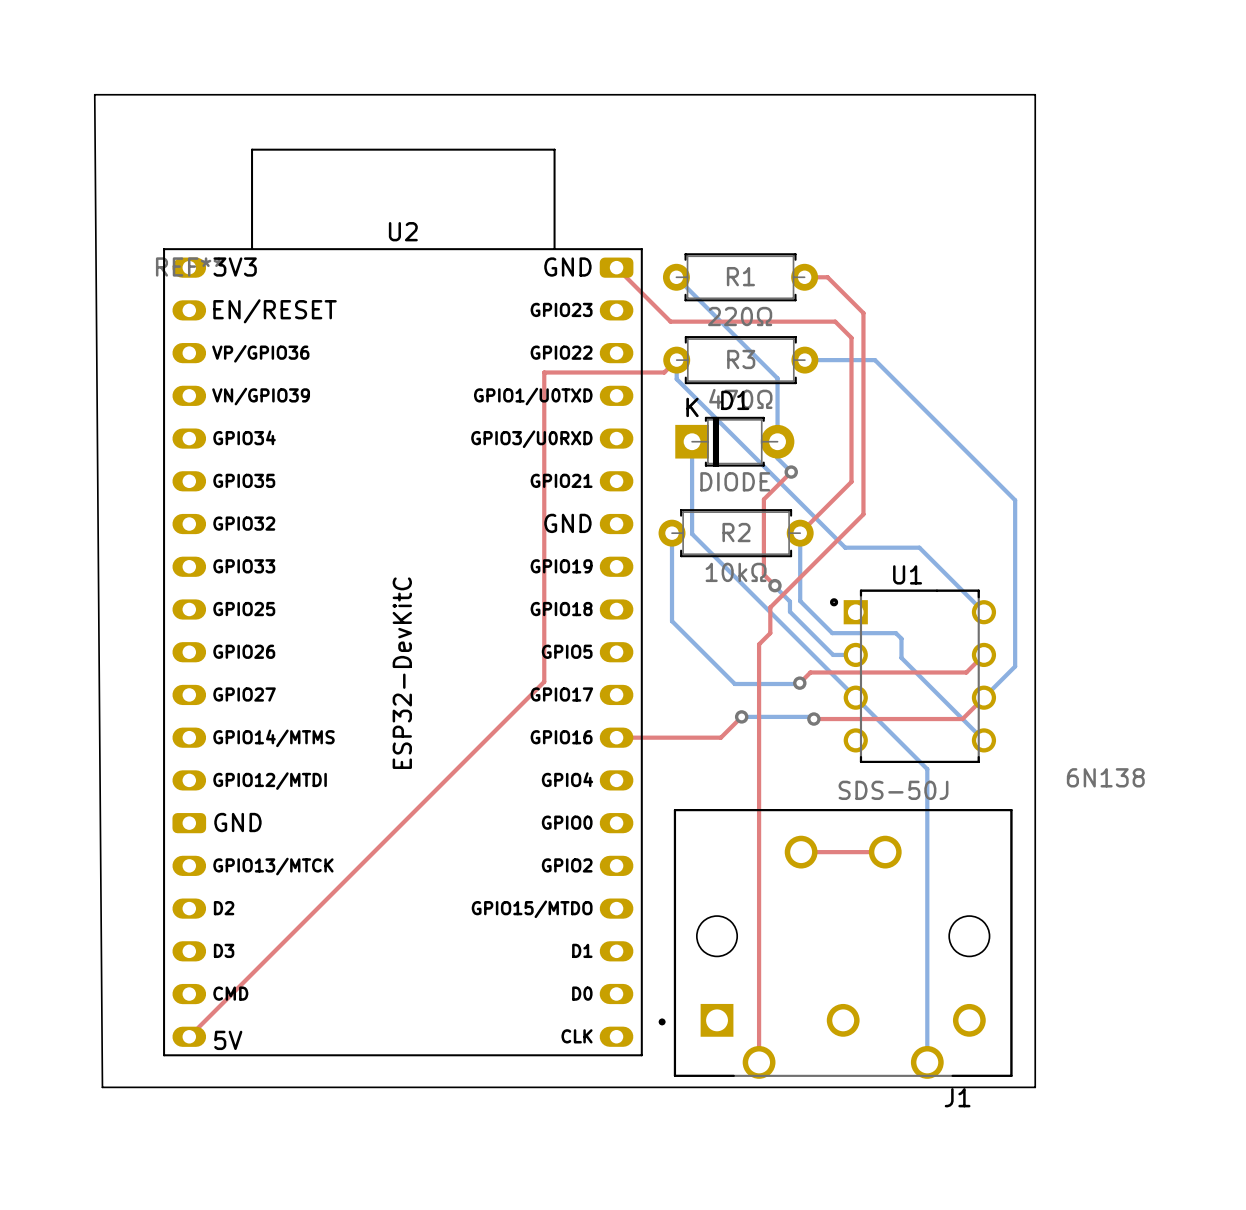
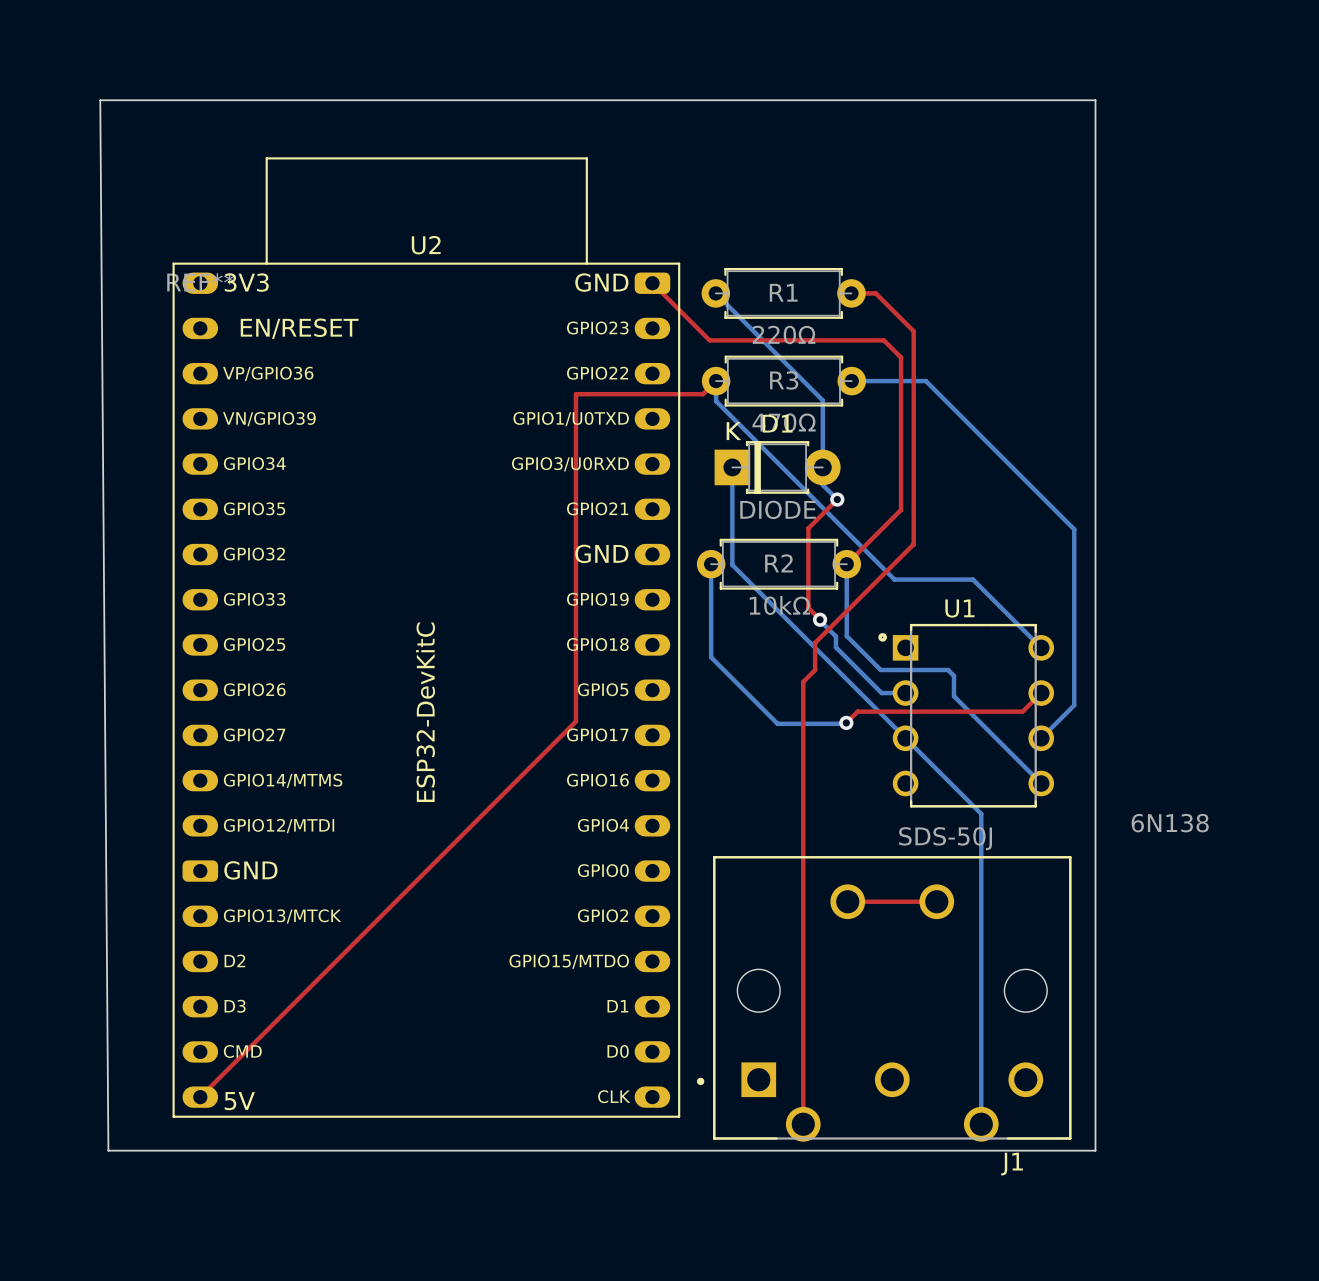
top track: (983, 697) (962, 719) (813, 719) -> none
bottom track: (741, 716) (811, 716) (813, 719) -> none
top track: (741, 716) (720, 737) (616, 737) -> none
via: (741, 716) -> none
via: (813, 719) -> none

